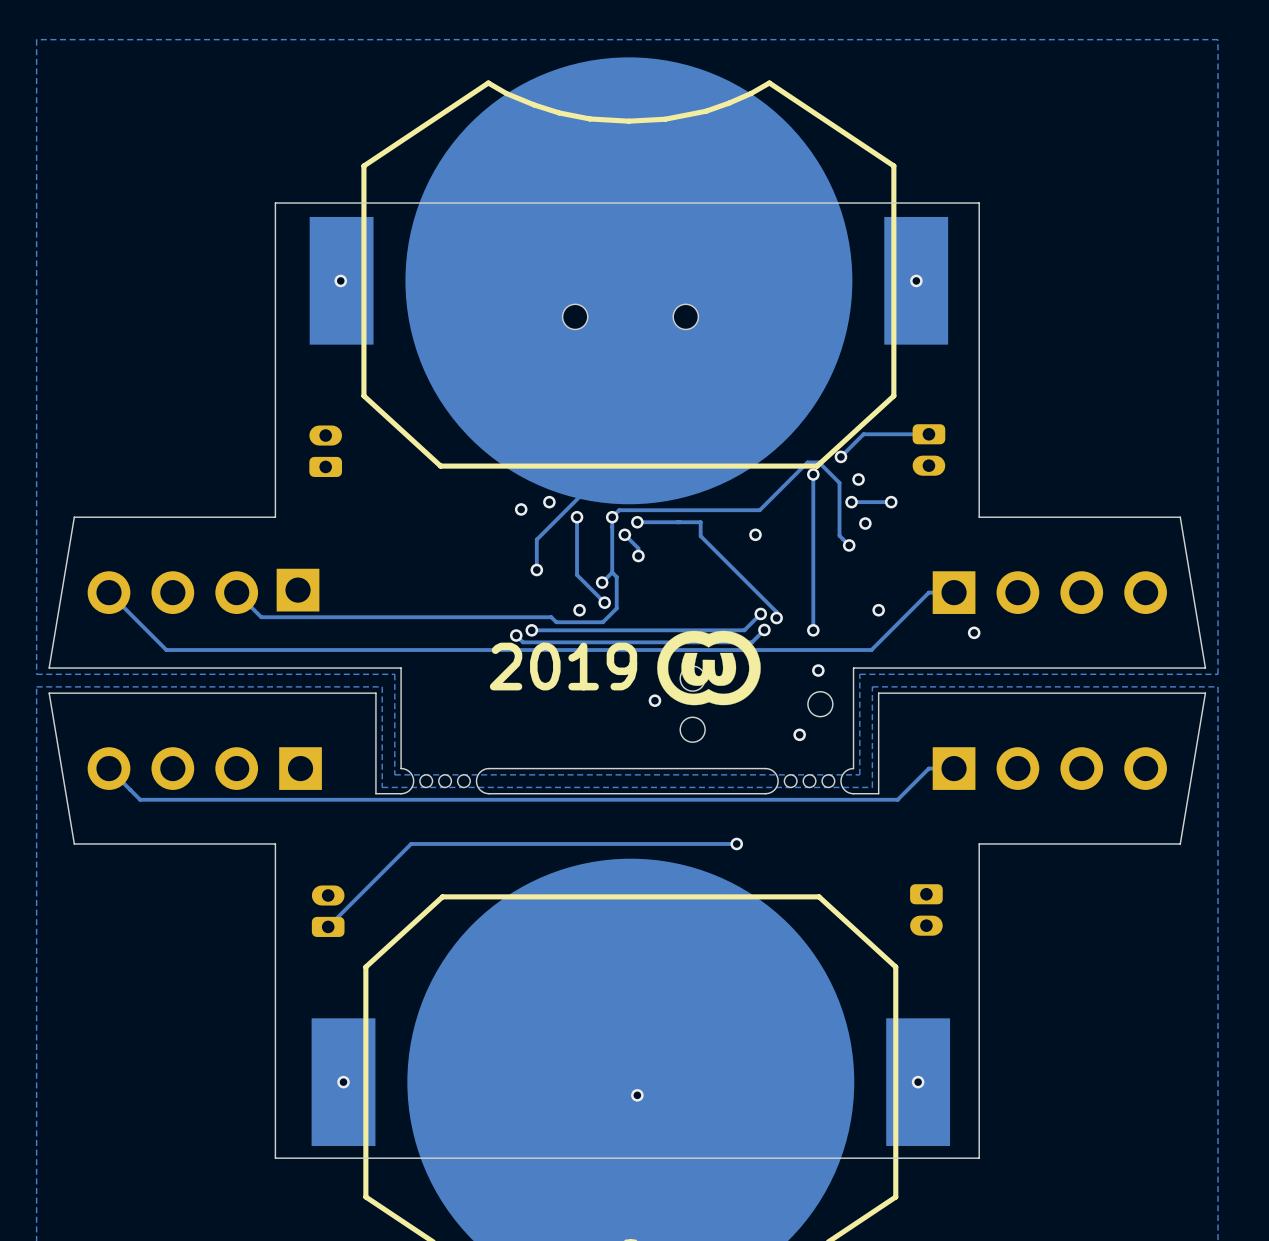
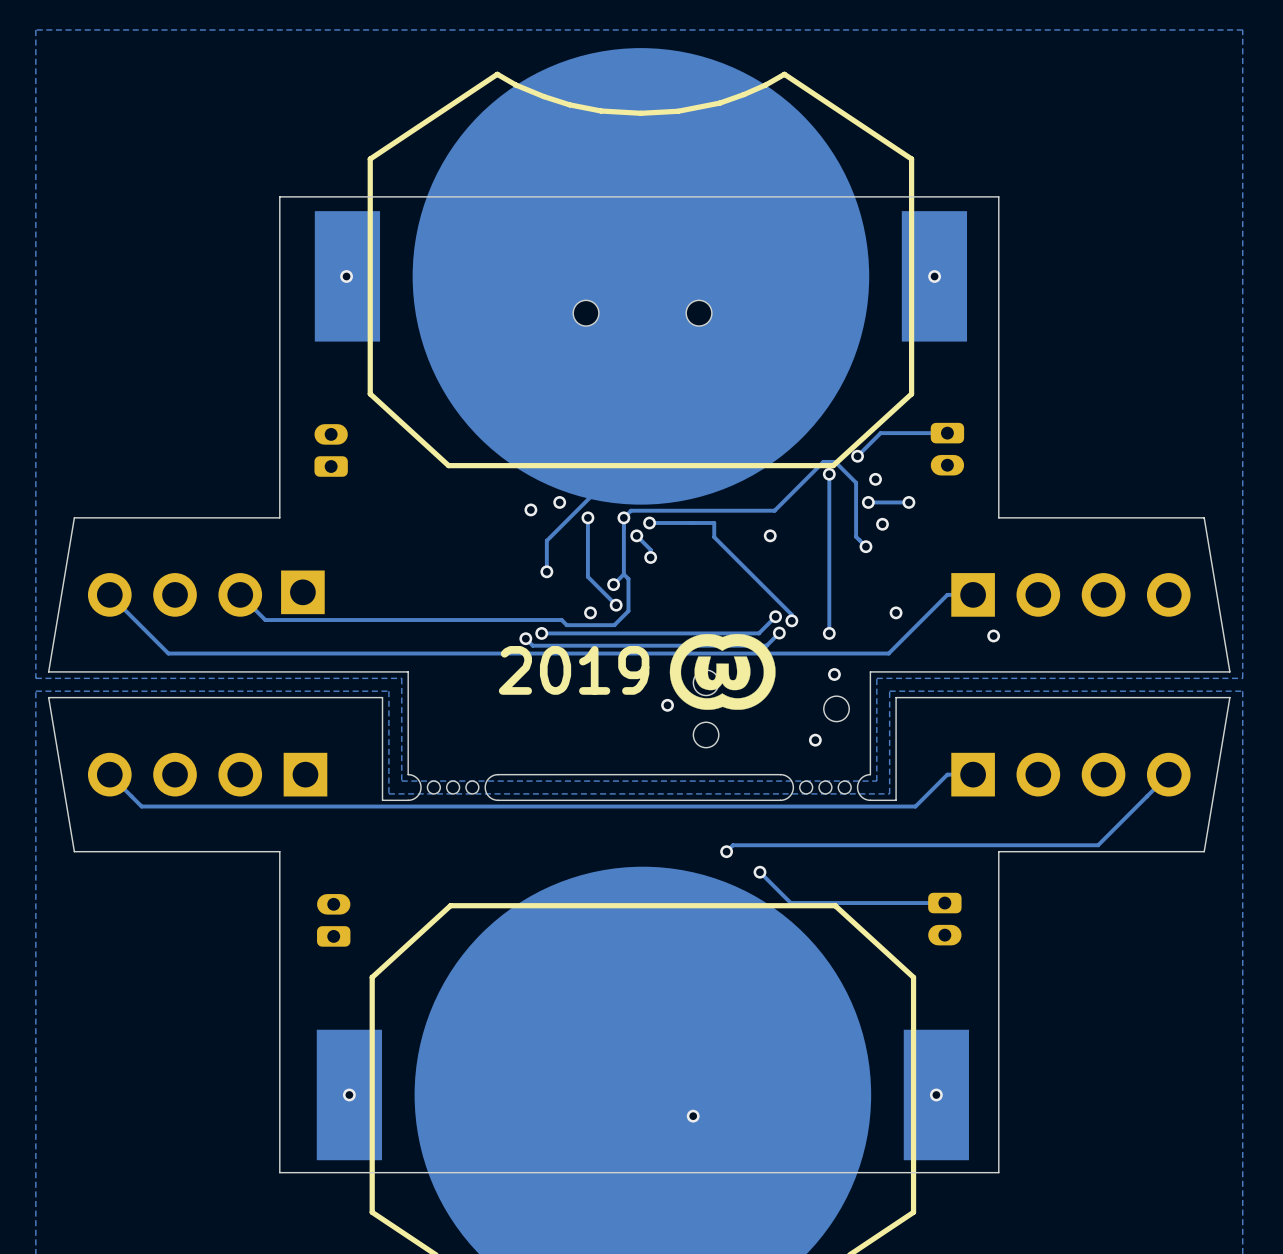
track: none -> (1168, 774) (1098, 845) (733, 845) (726, 851)
via: none -> (726, 851)
track: (736, 843) (411, 843) (328, 926) -> none
via: (736, 843) -> none
track: none -> (759, 872) (790, 903) (944, 903)
via: none -> (759, 872)
via position: (637, 1095) -> (693, 1116)

